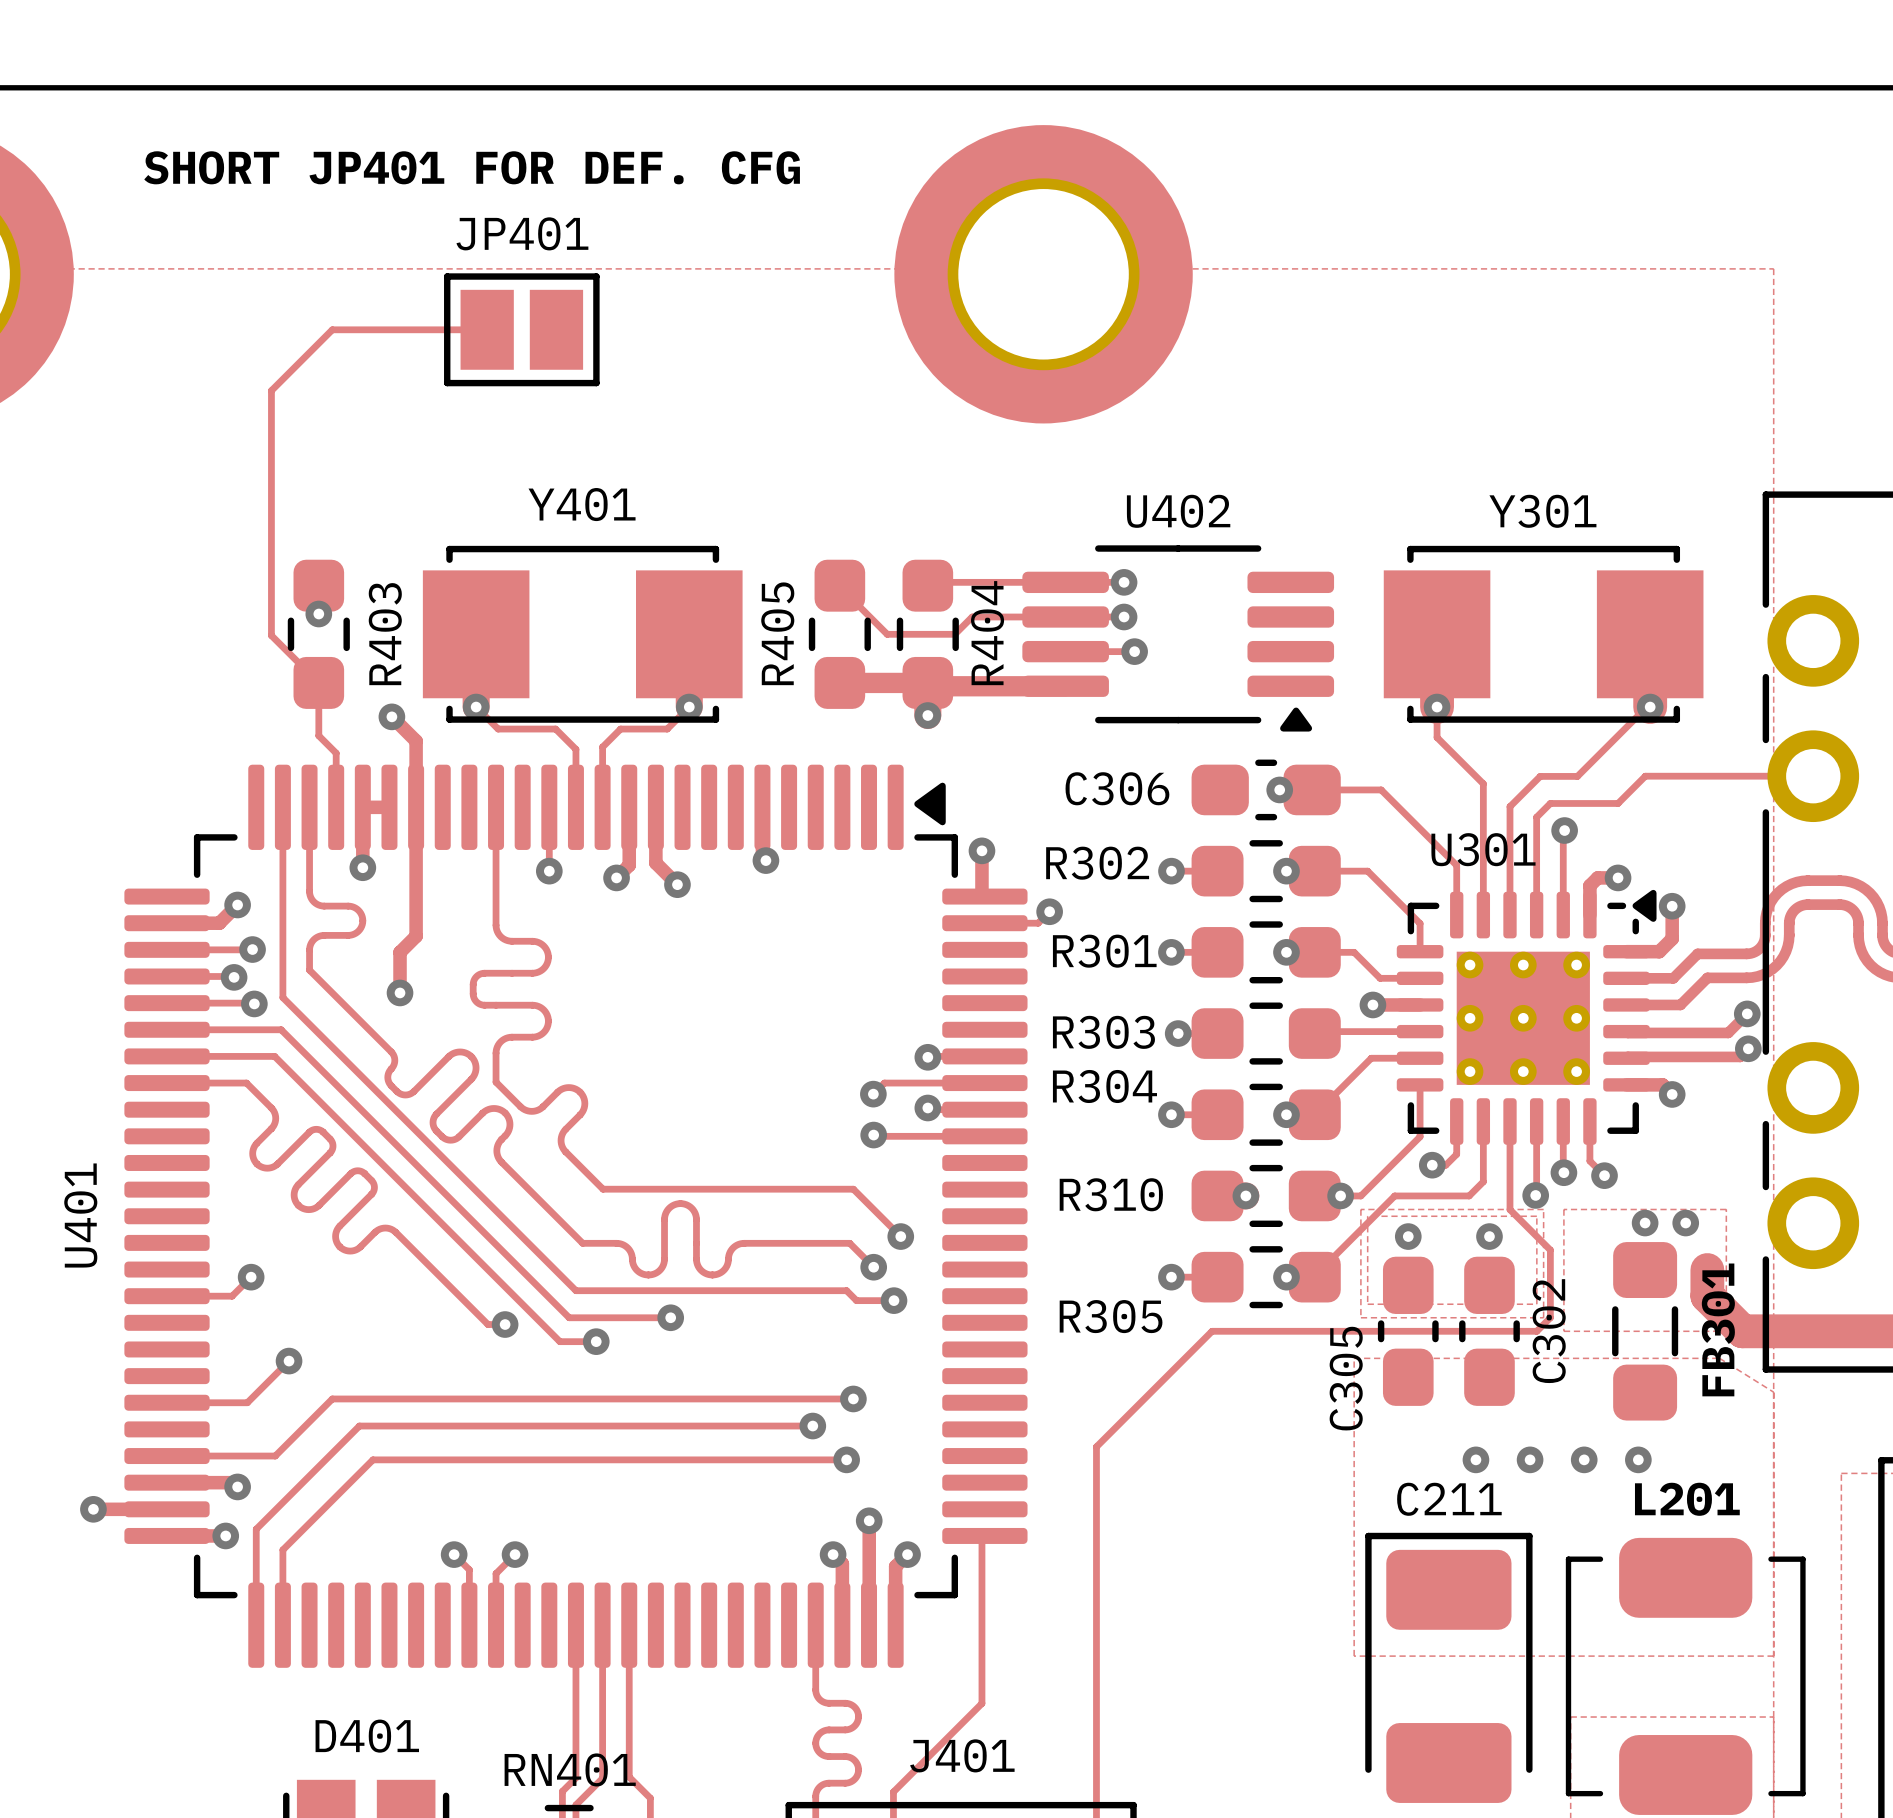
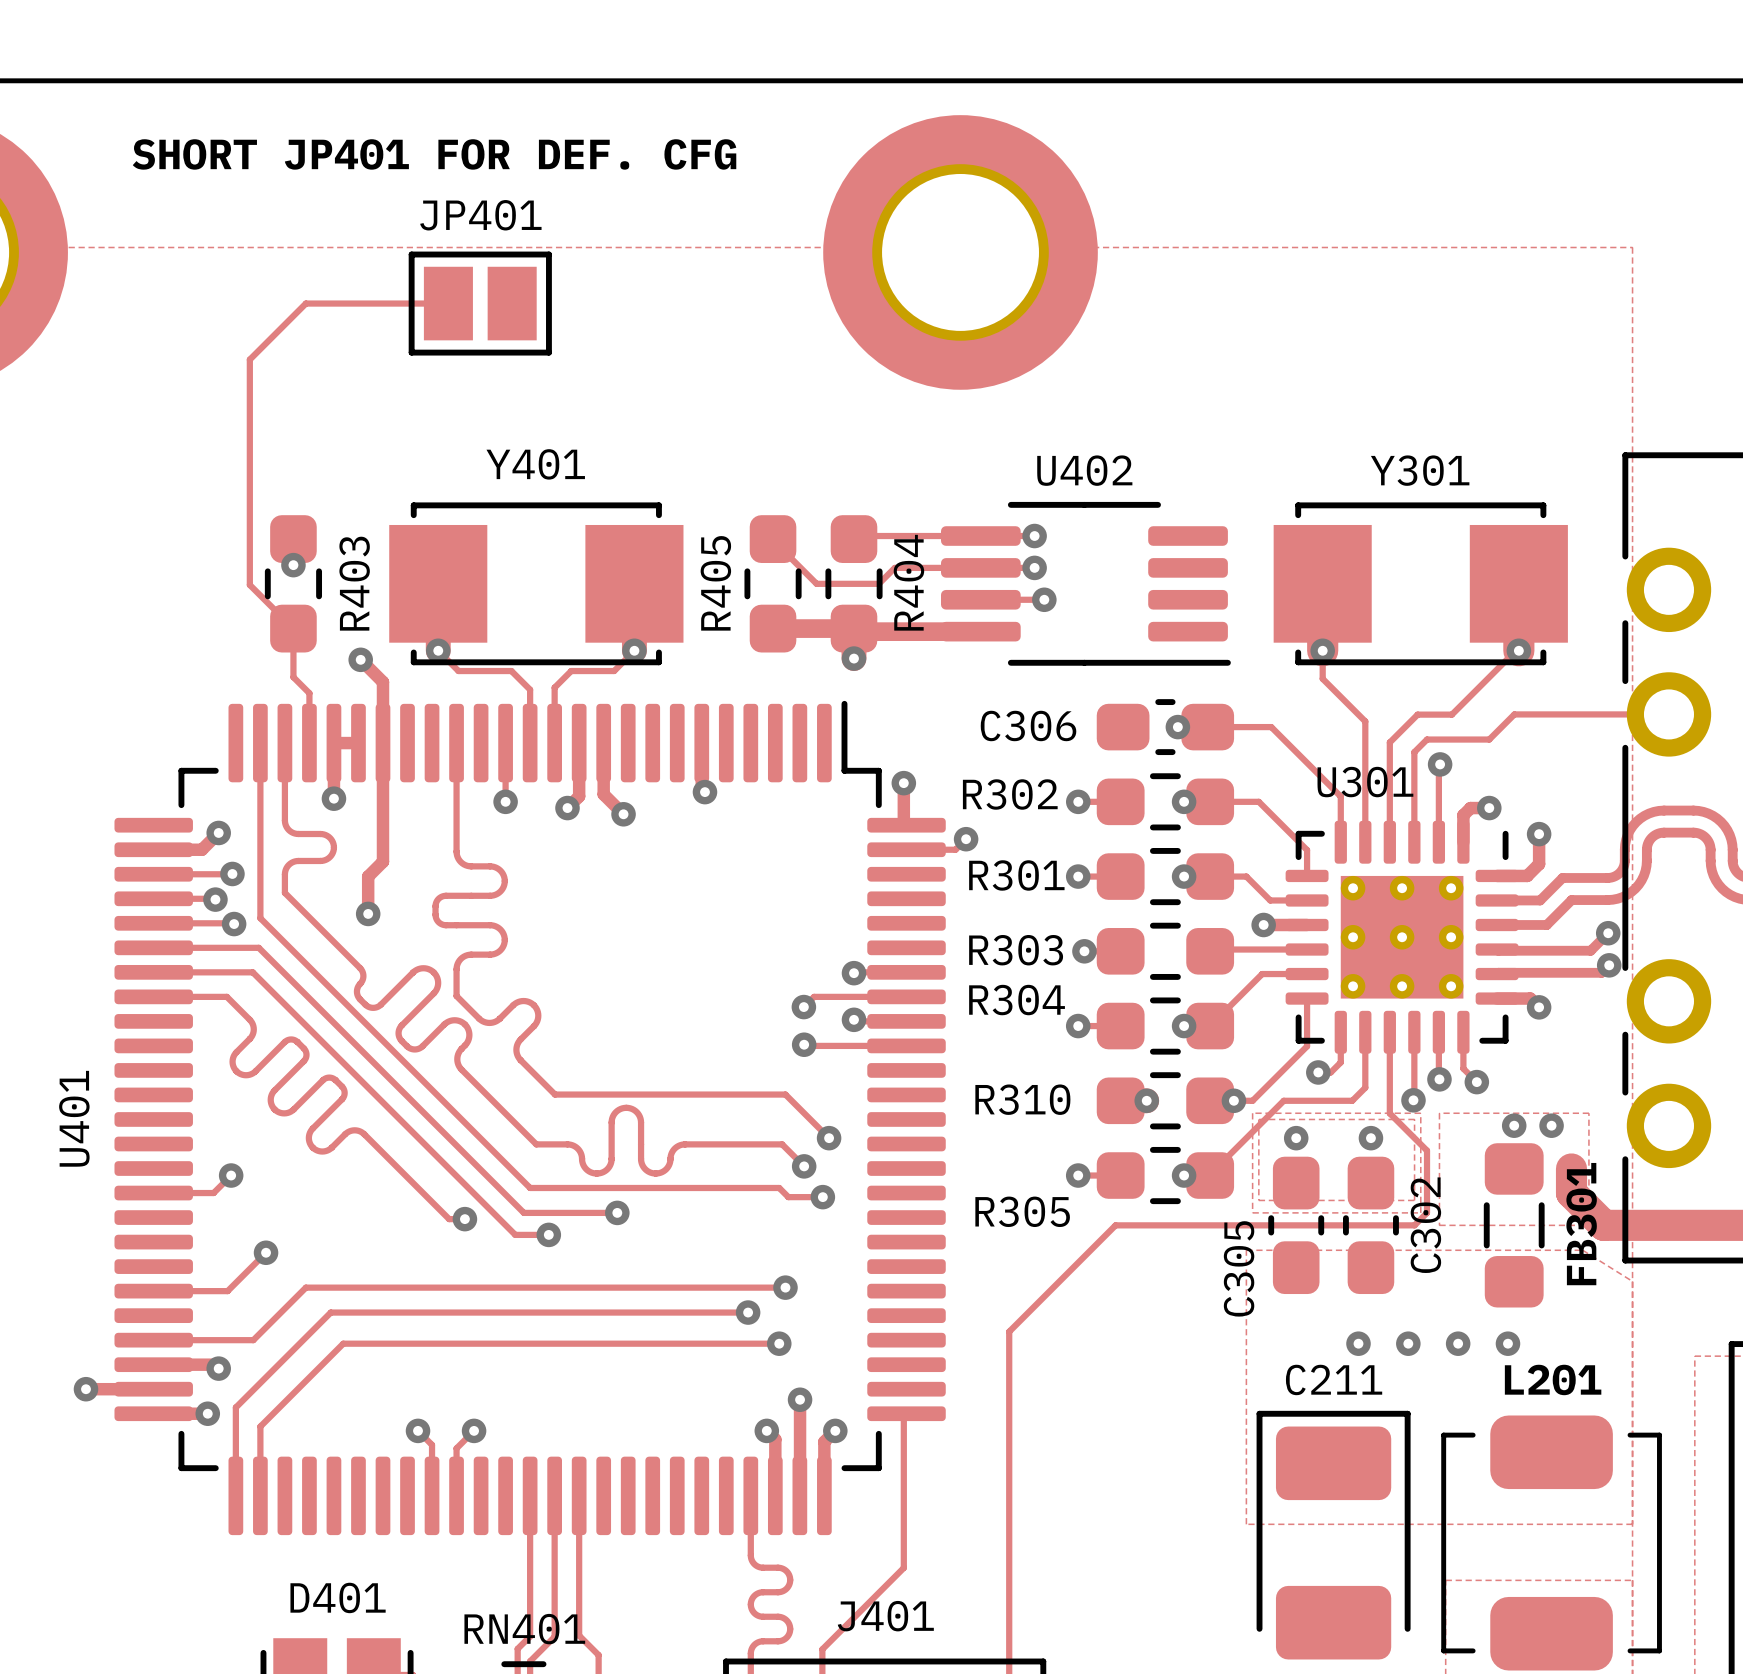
U402 footprint: [1022, 545, 1335, 732] -> [941, 501, 1231, 666]
U401 footprint: [124, 764, 1028, 1668] -> [114, 700, 946, 1536]
U301 footprint: [1396, 889, 1657, 1145] -> [1285, 820, 1519, 1054]

